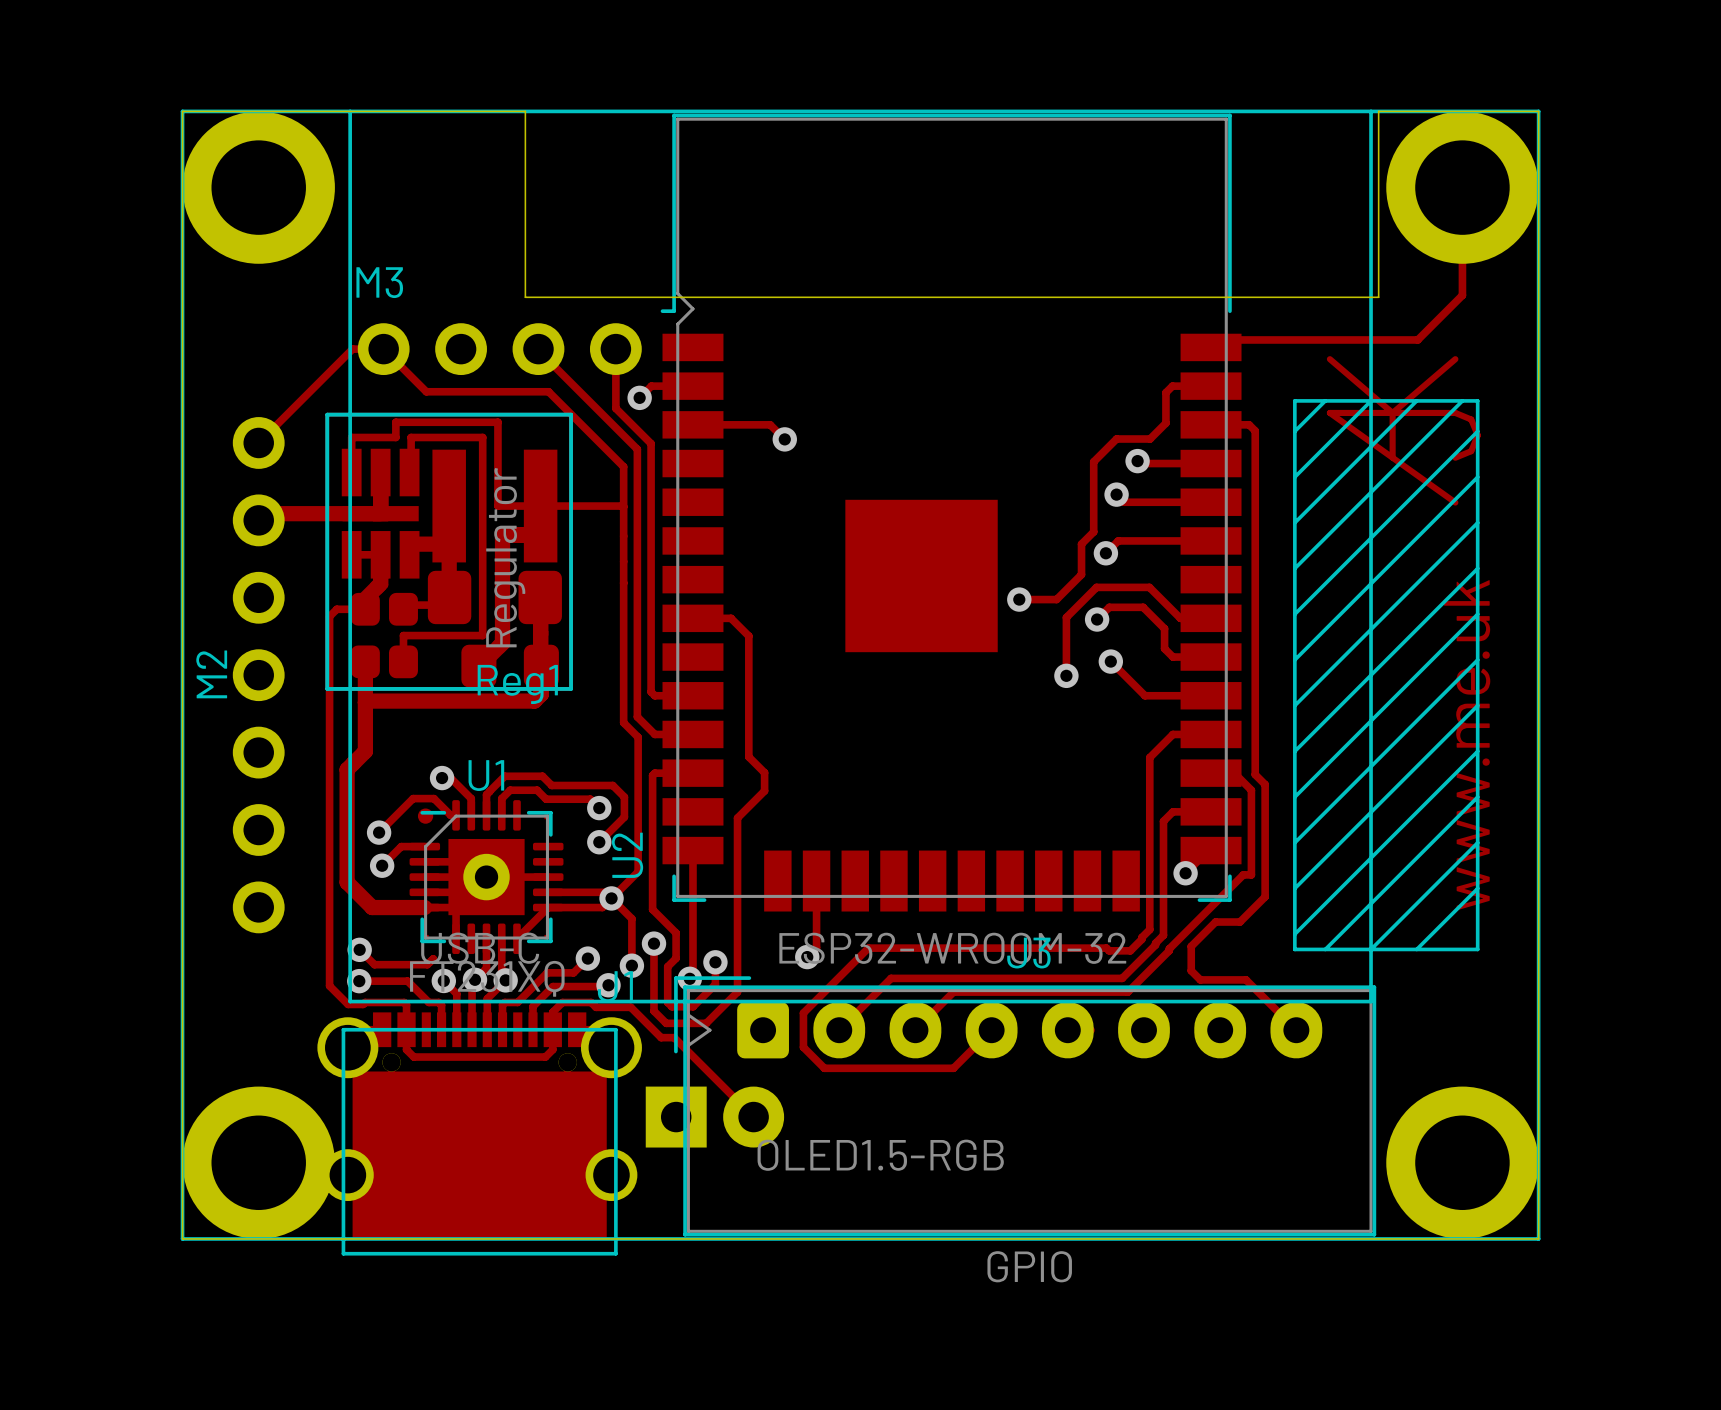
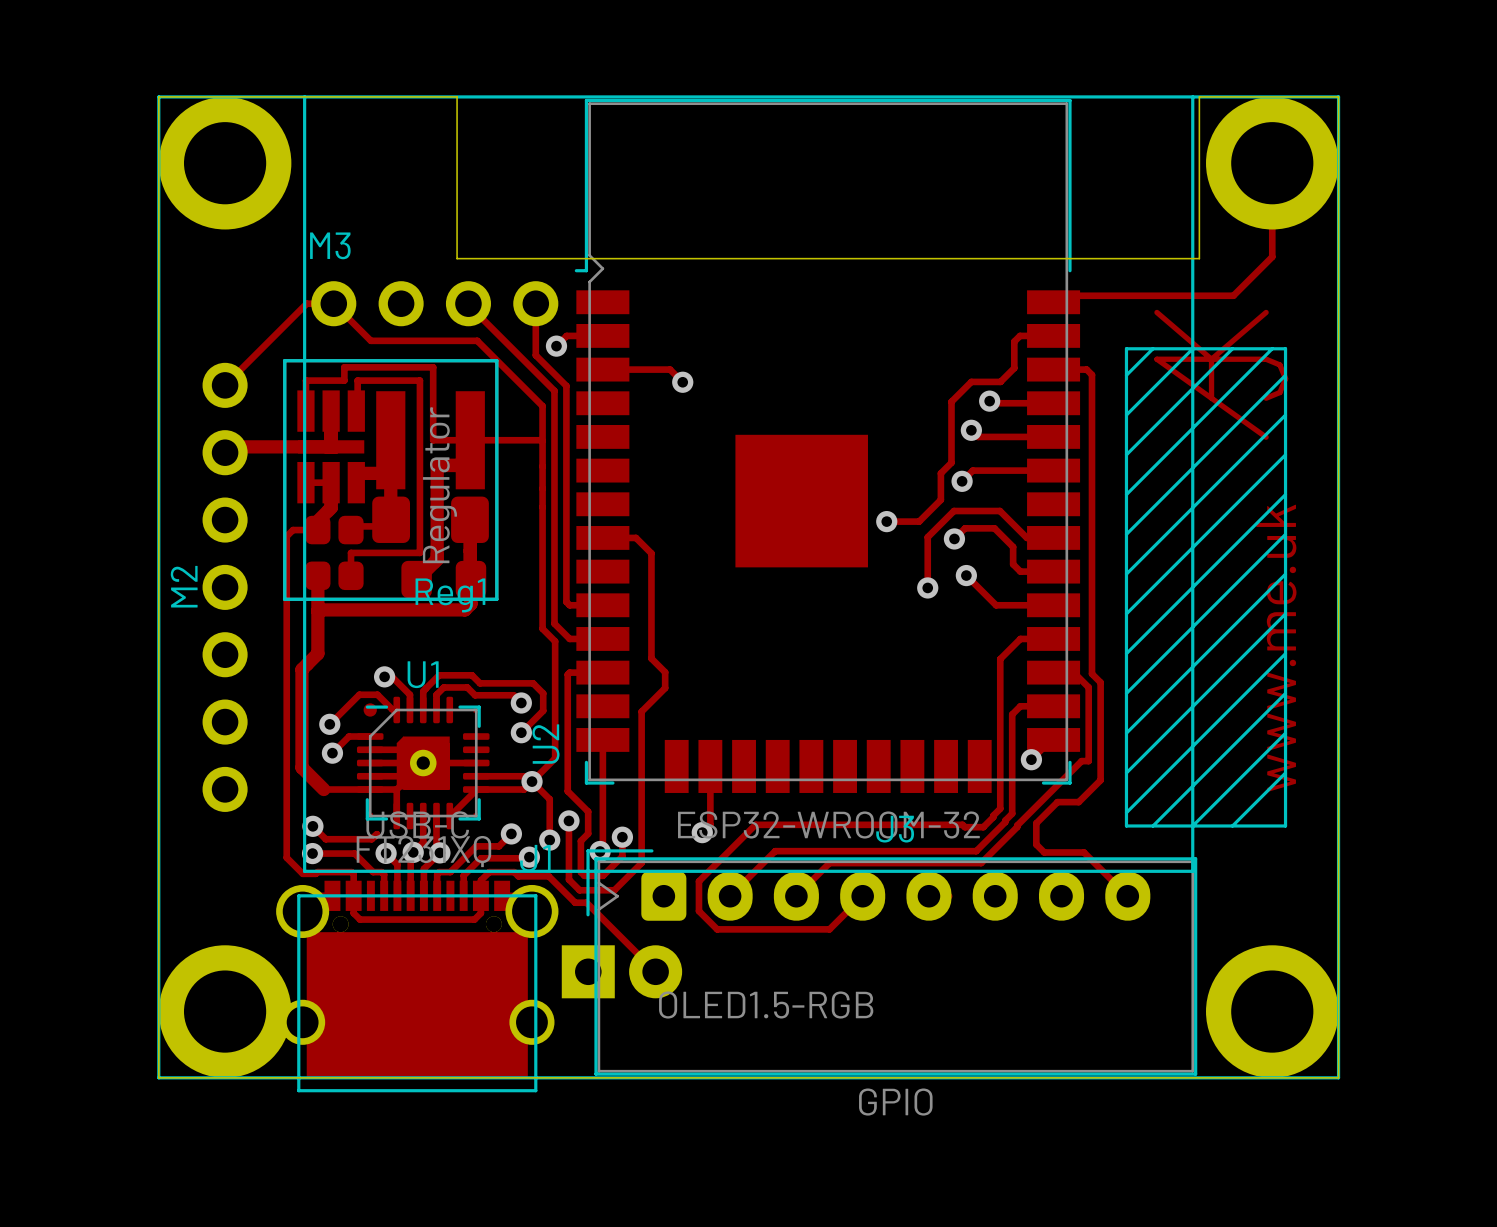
U1 footprint: [409, 800, 564, 955] -> [356, 696, 490, 830]
track width: thick (372, 907) (424, 907) -> thin (323, 789) (369, 789)

